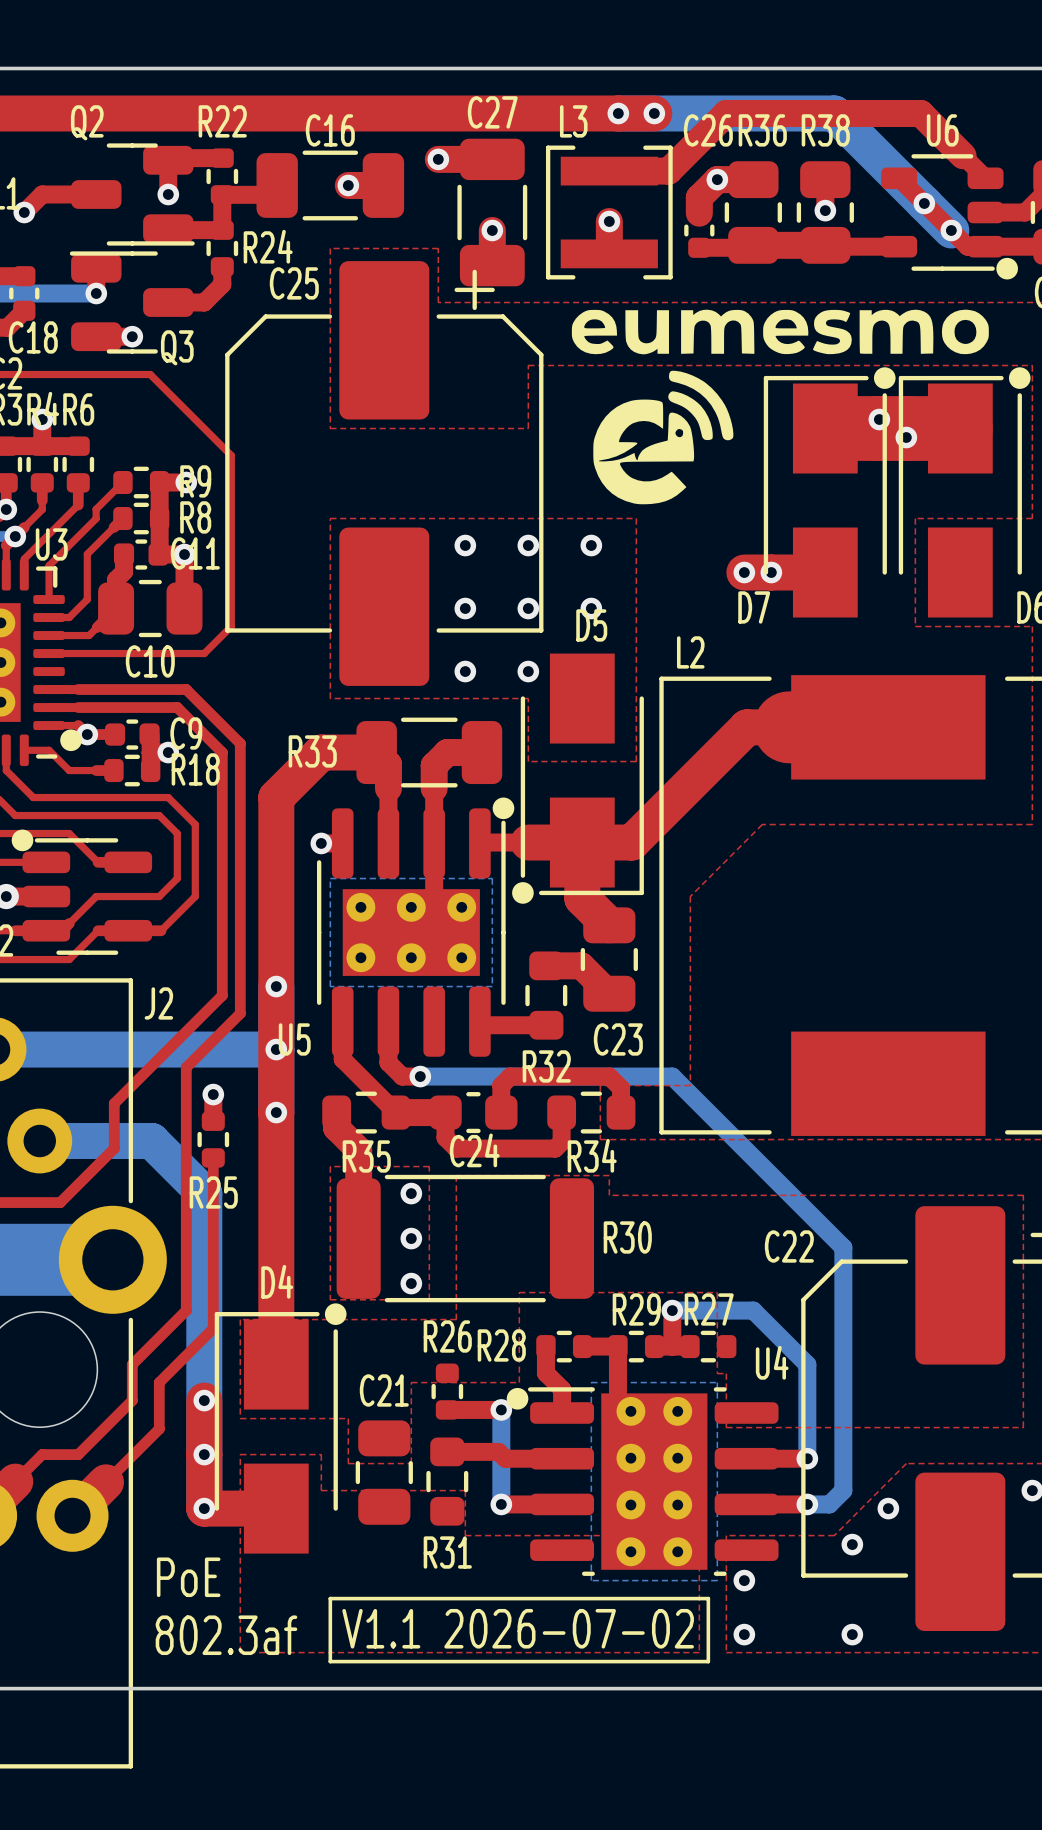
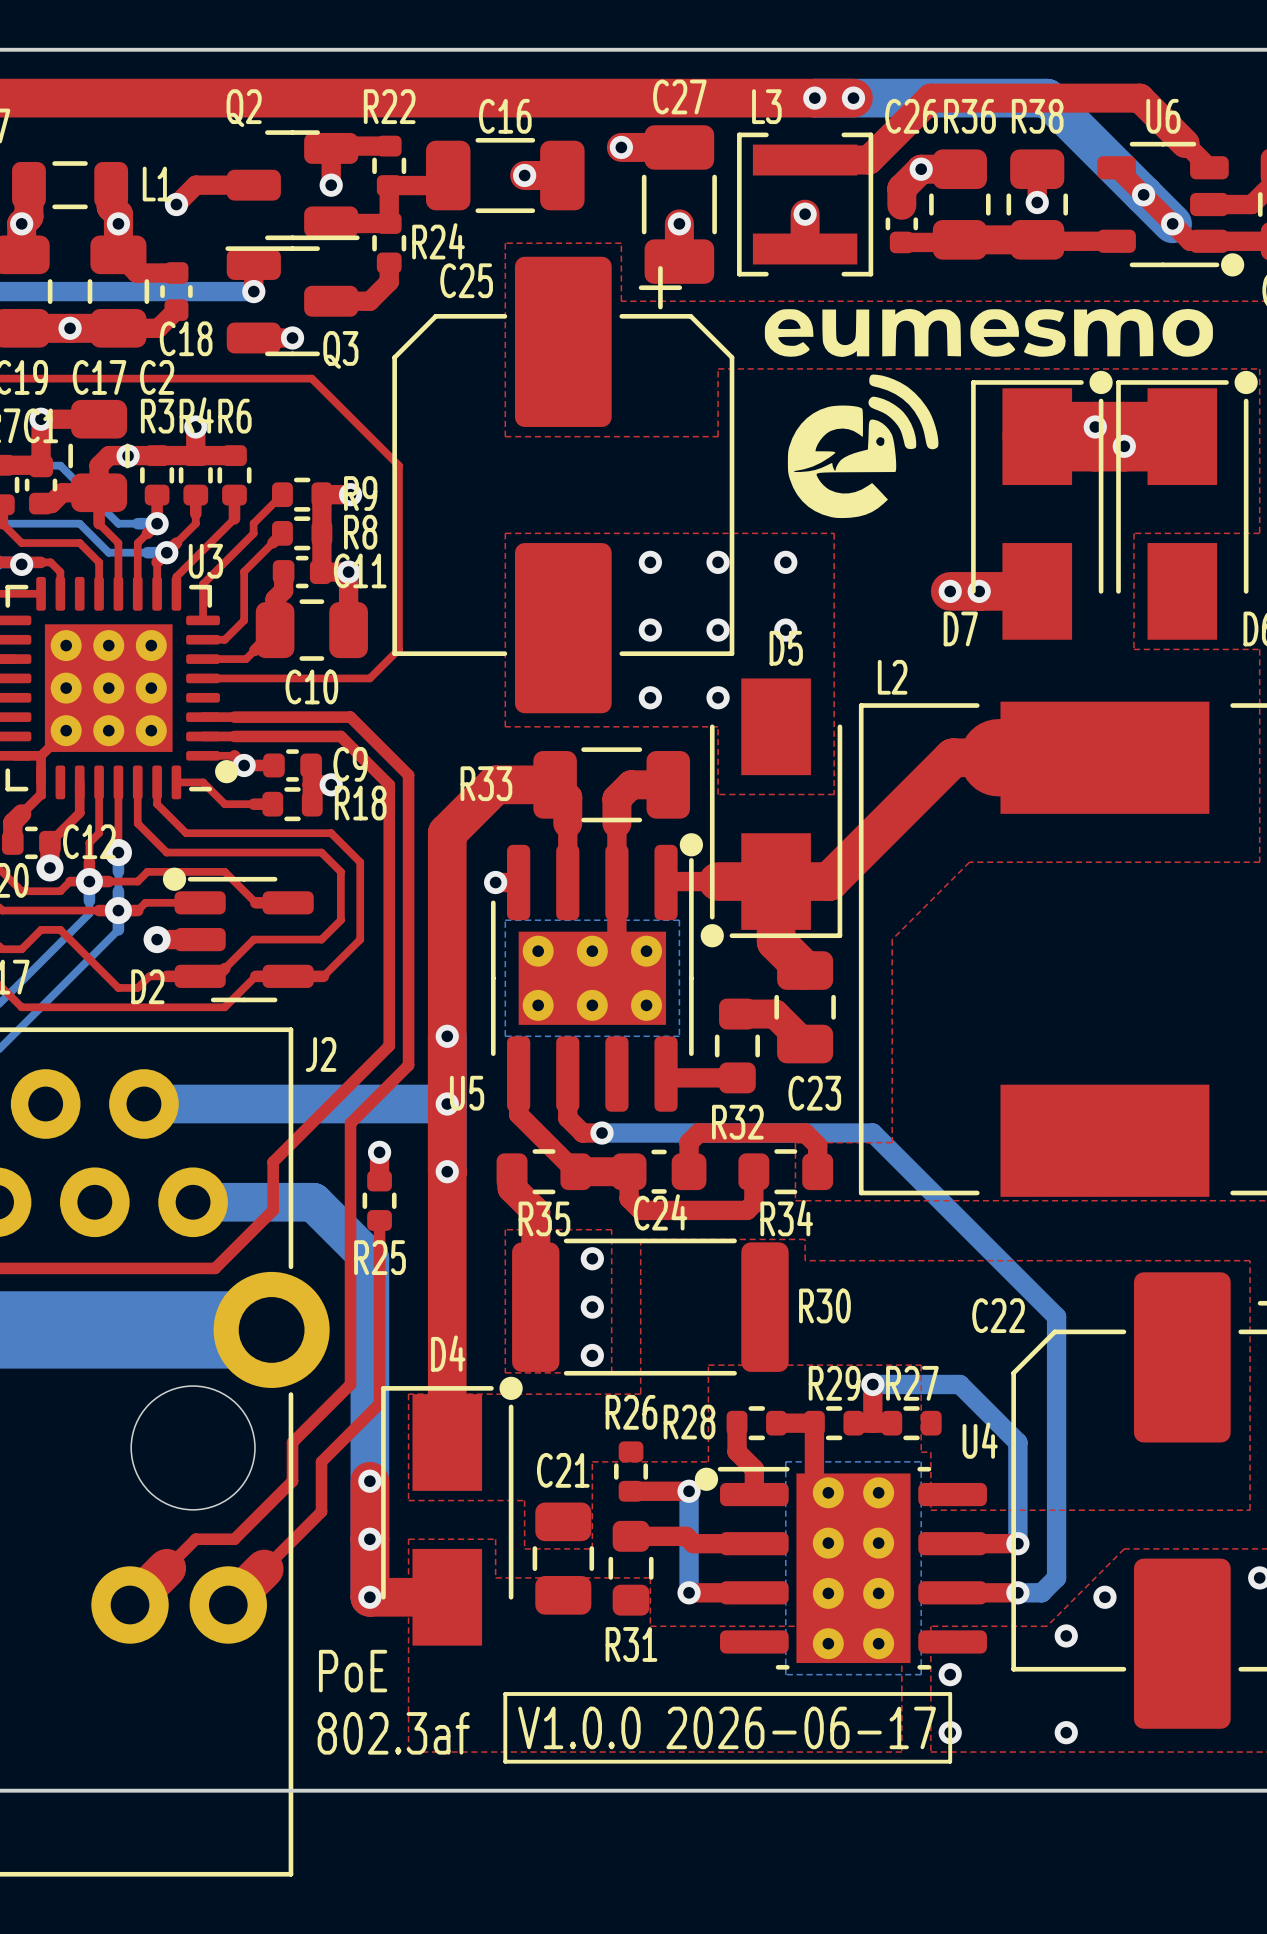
line: (708, 1598) (708, 1661) -> (911, 1693) (950, 1693) (950, 1761) (911, 1761)
text: V1.1 2026-07-02 (518, 1628) -> V1.0.0 2026-06-17 (727, 1727)

